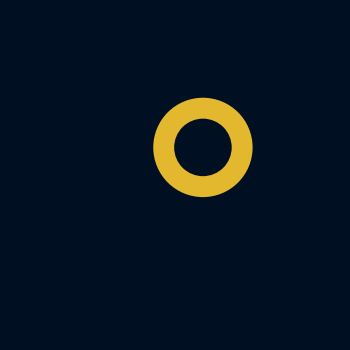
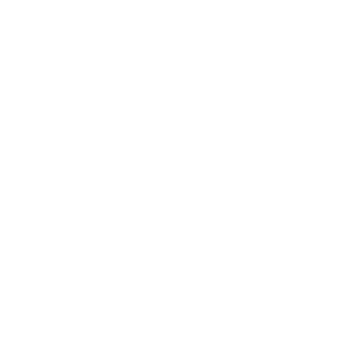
part: (202, 147) -> none

